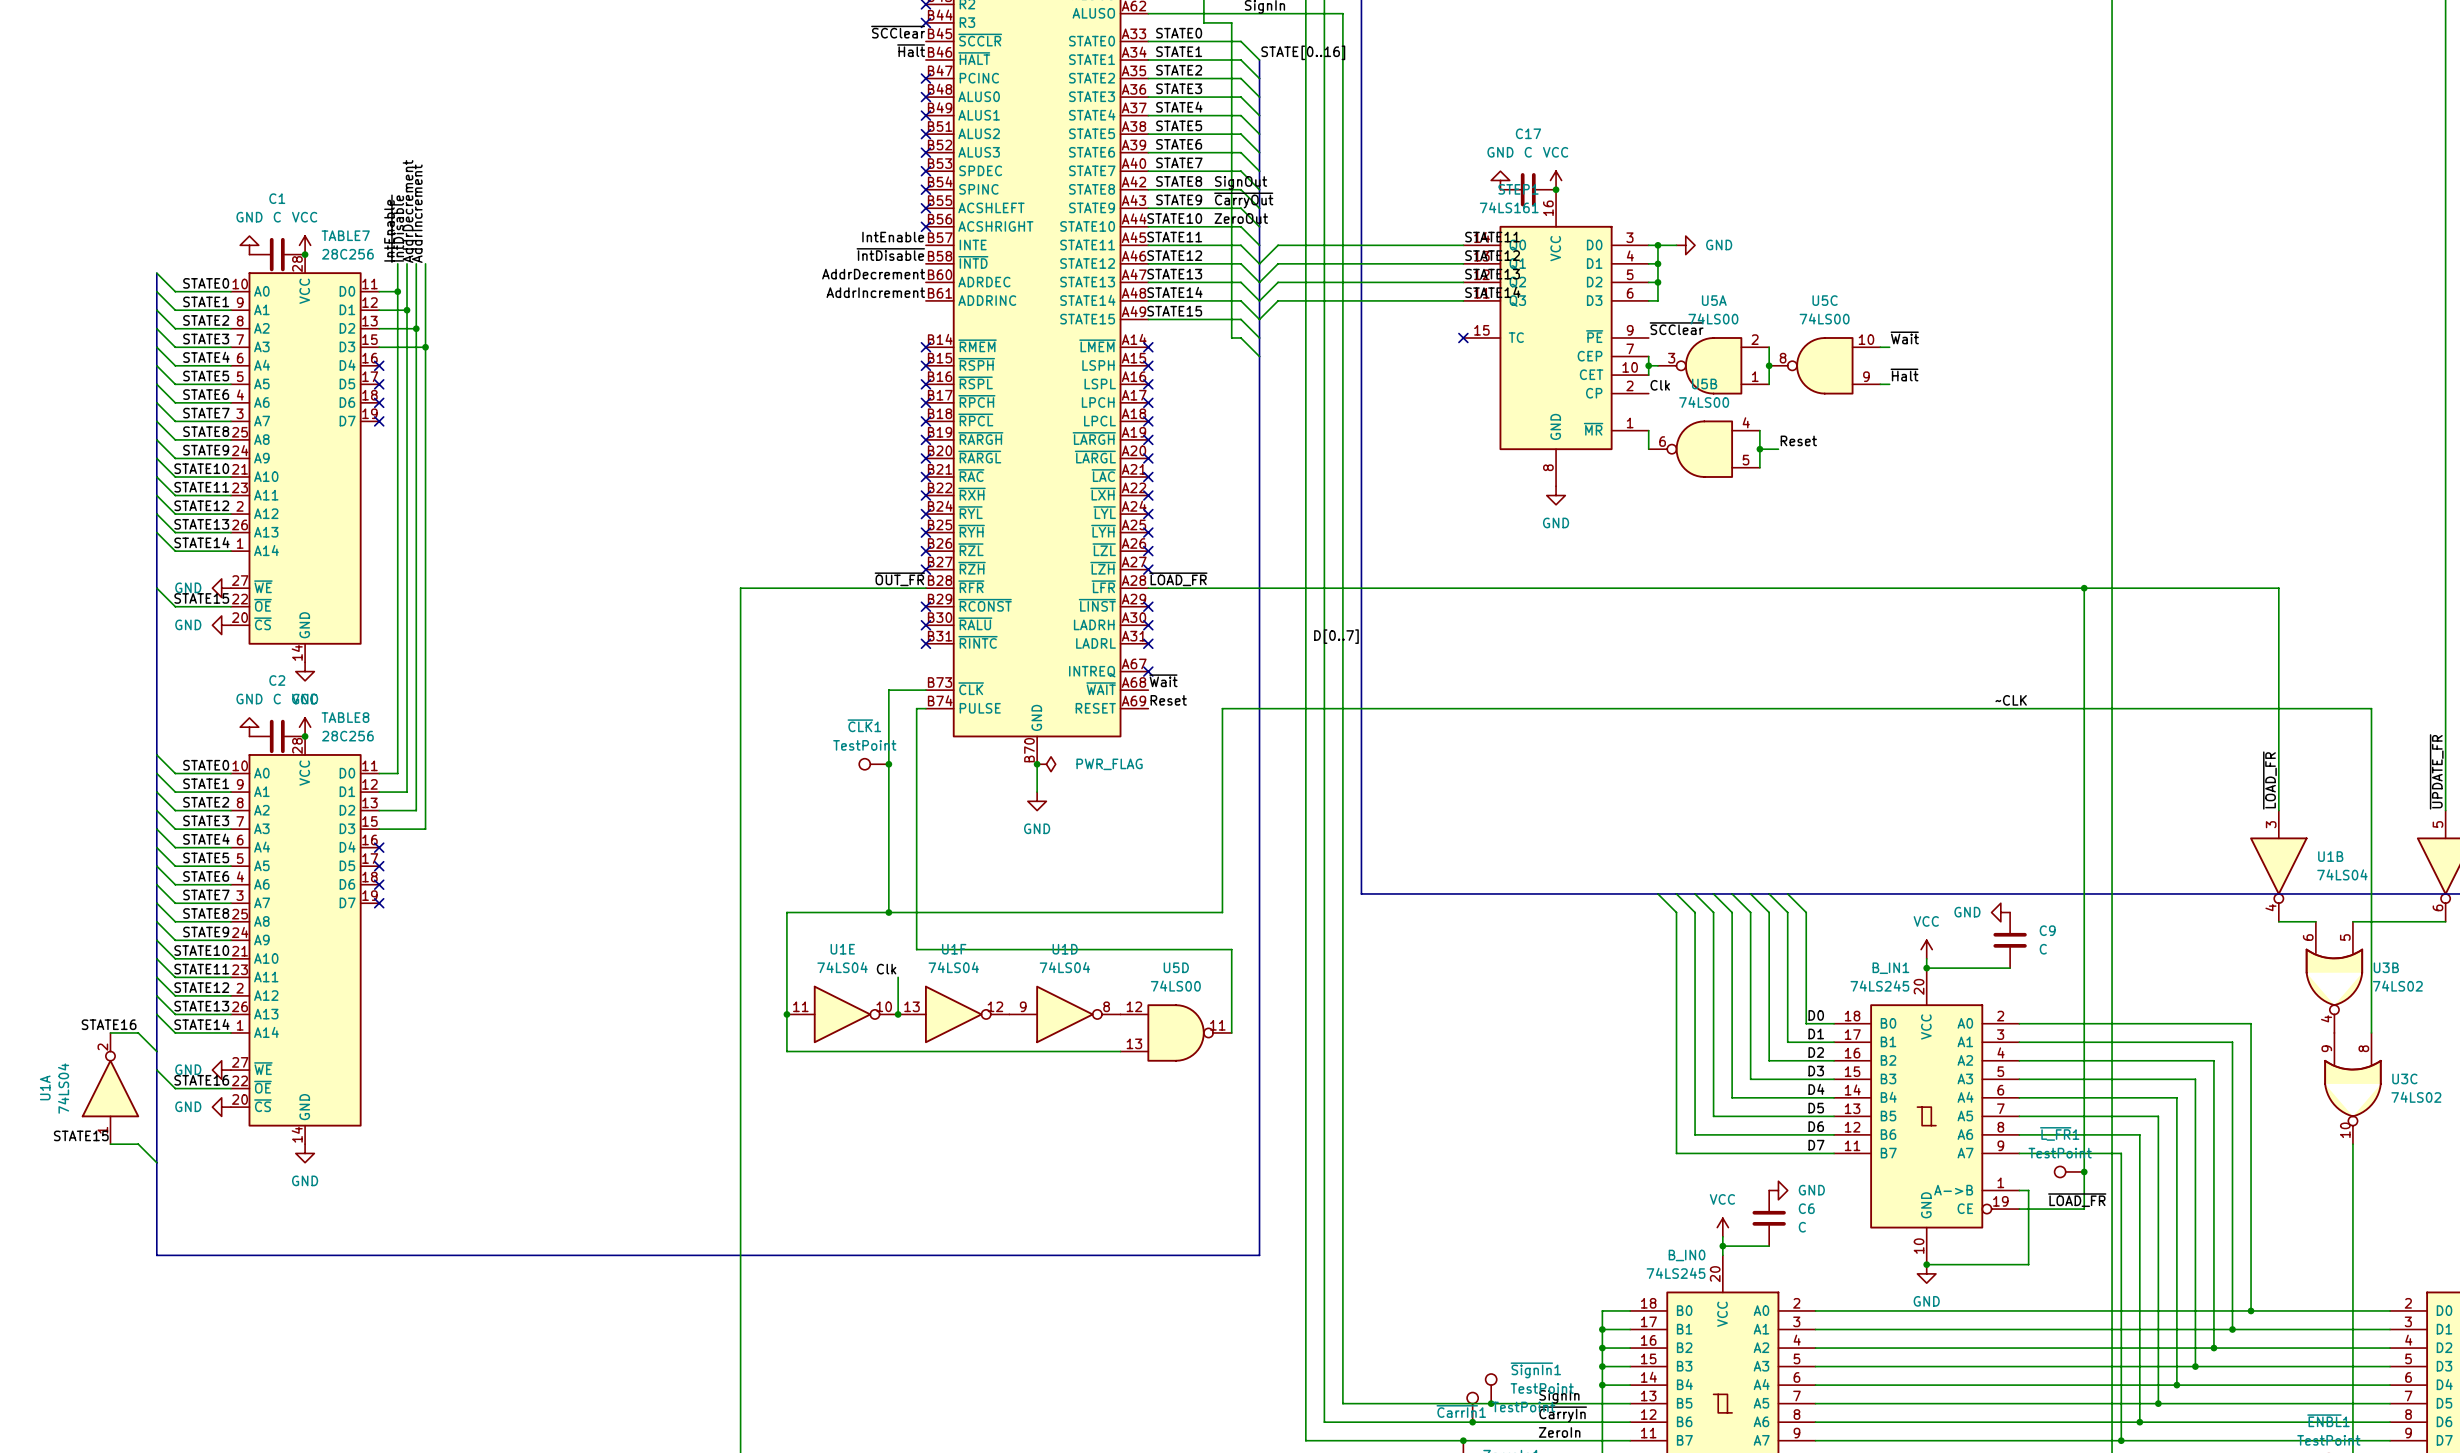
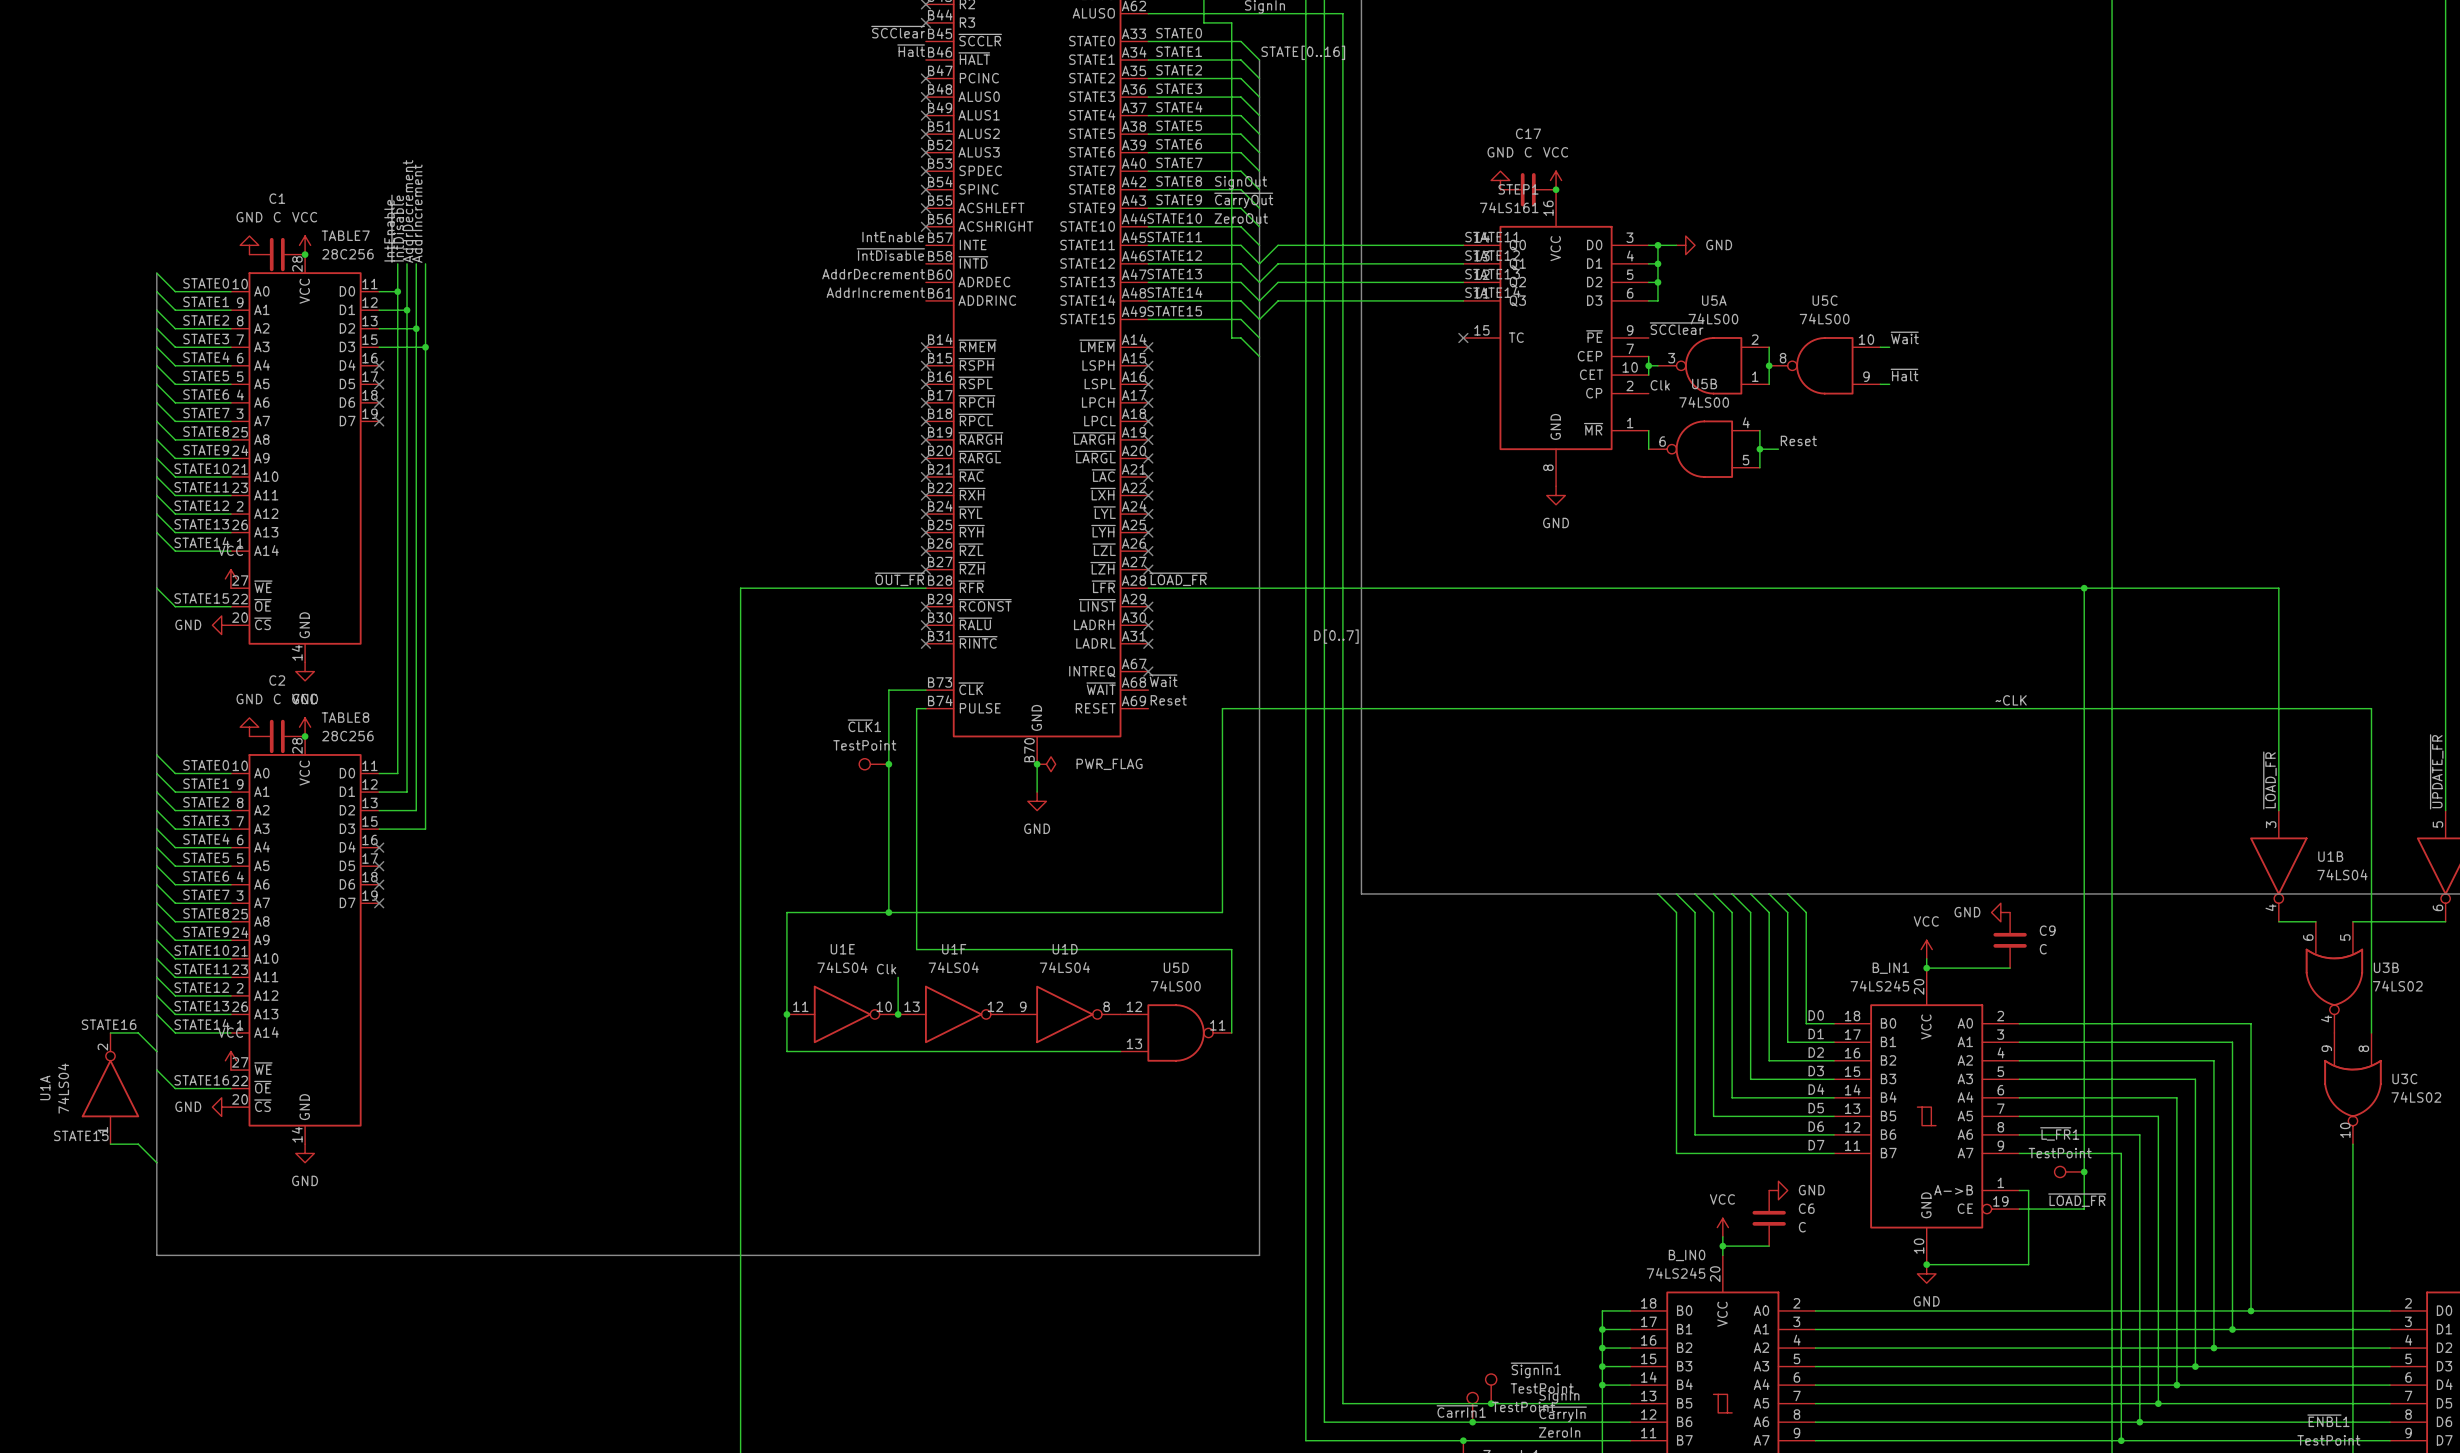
power symbol: none -> VCC (230, 578)
power symbol: GND (221, 588) -> none
power symbol: none -> VCC (230, 1060)
power symbol: GND (221, 1070) -> none

